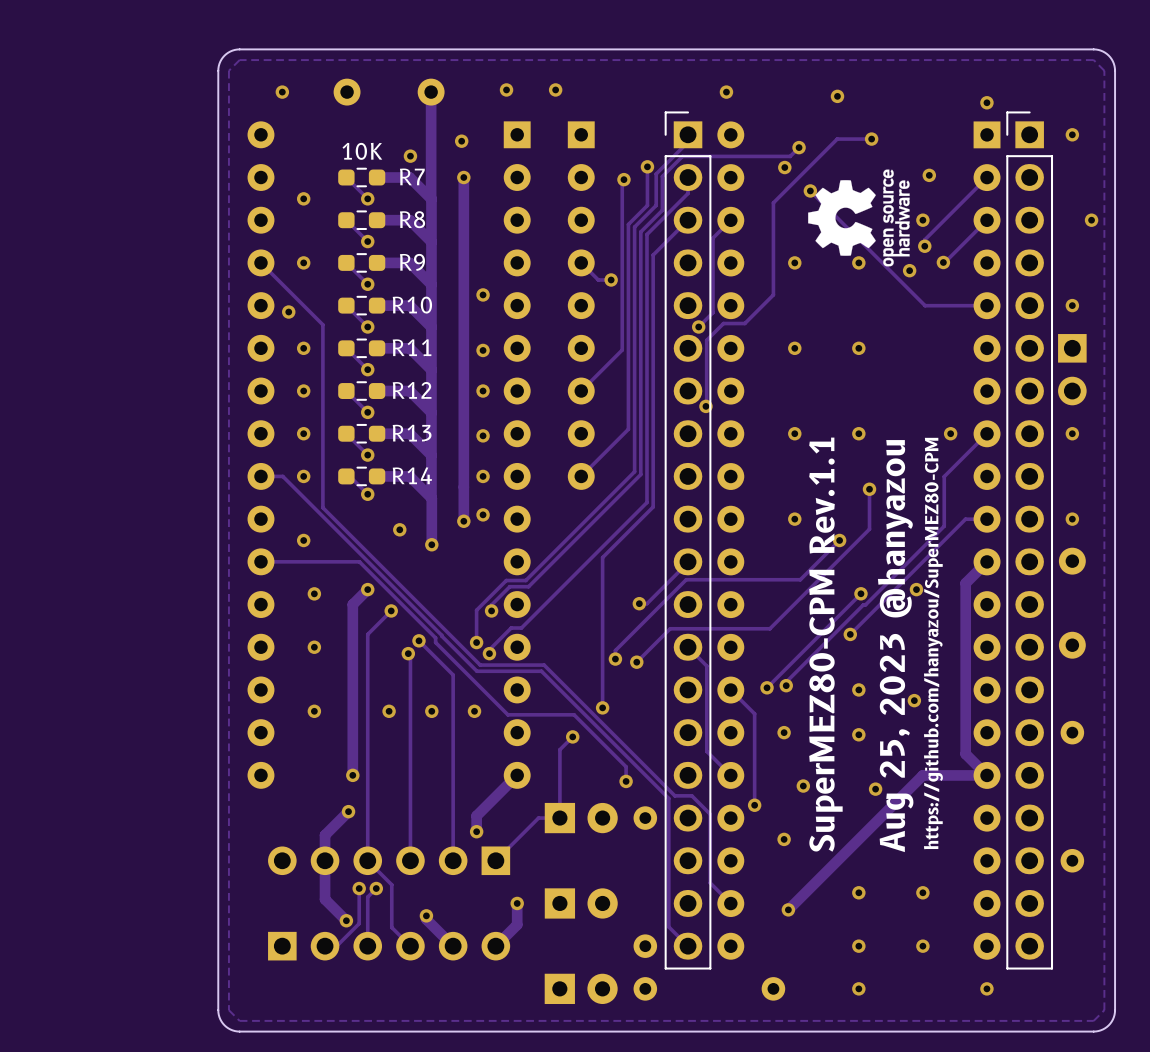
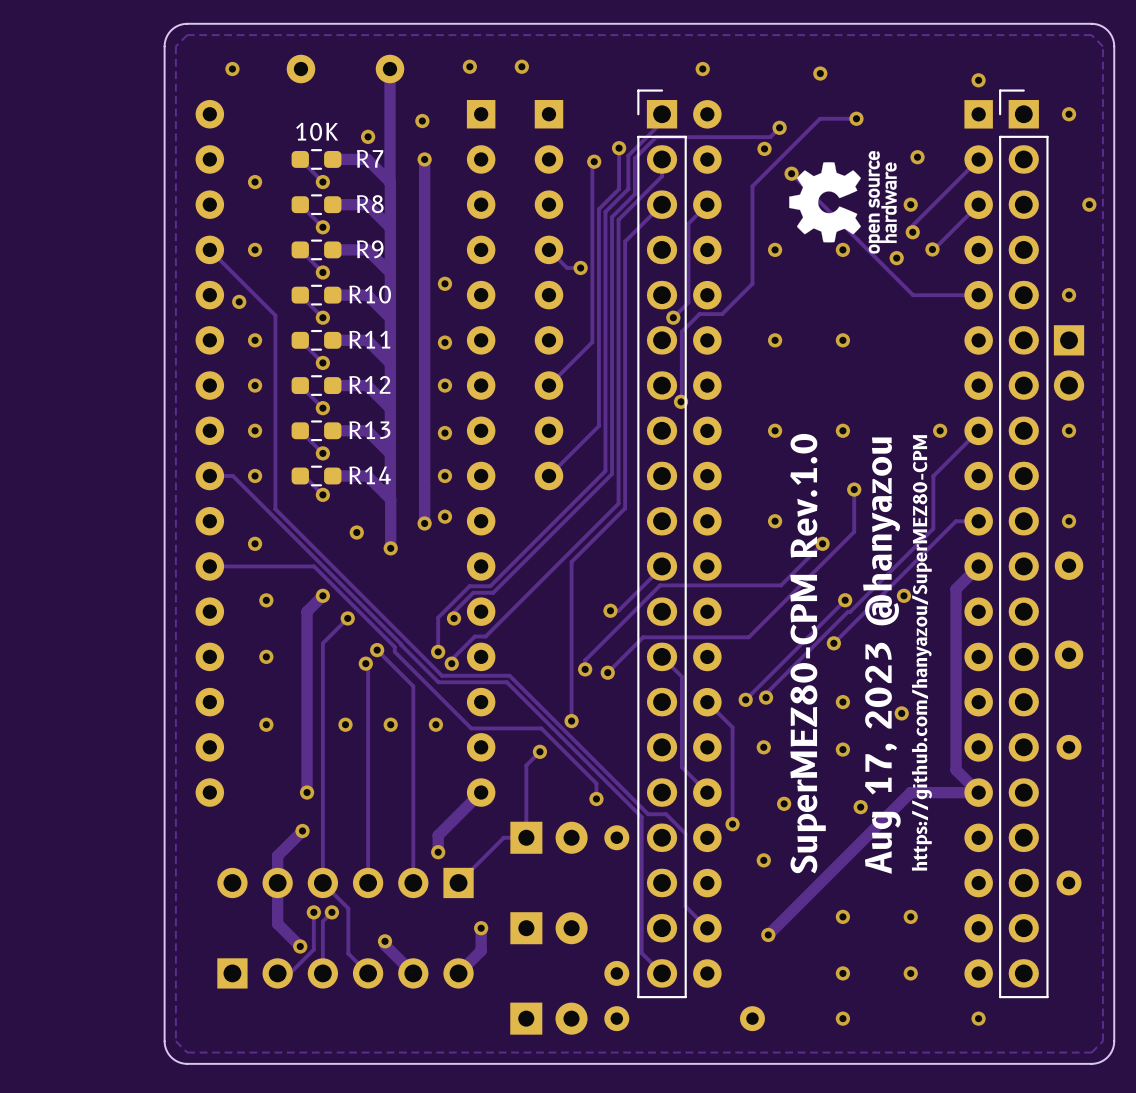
text: SuperMEZ80-CPM Rev.1.1 (825, 644) -> SuperMEZ80-CPM Rev.1.0 (808, 653)
text: Aug 25, 2023 @hanyazou (895, 646) -> Aug 17, 2023 @hanyazou (881, 655)

